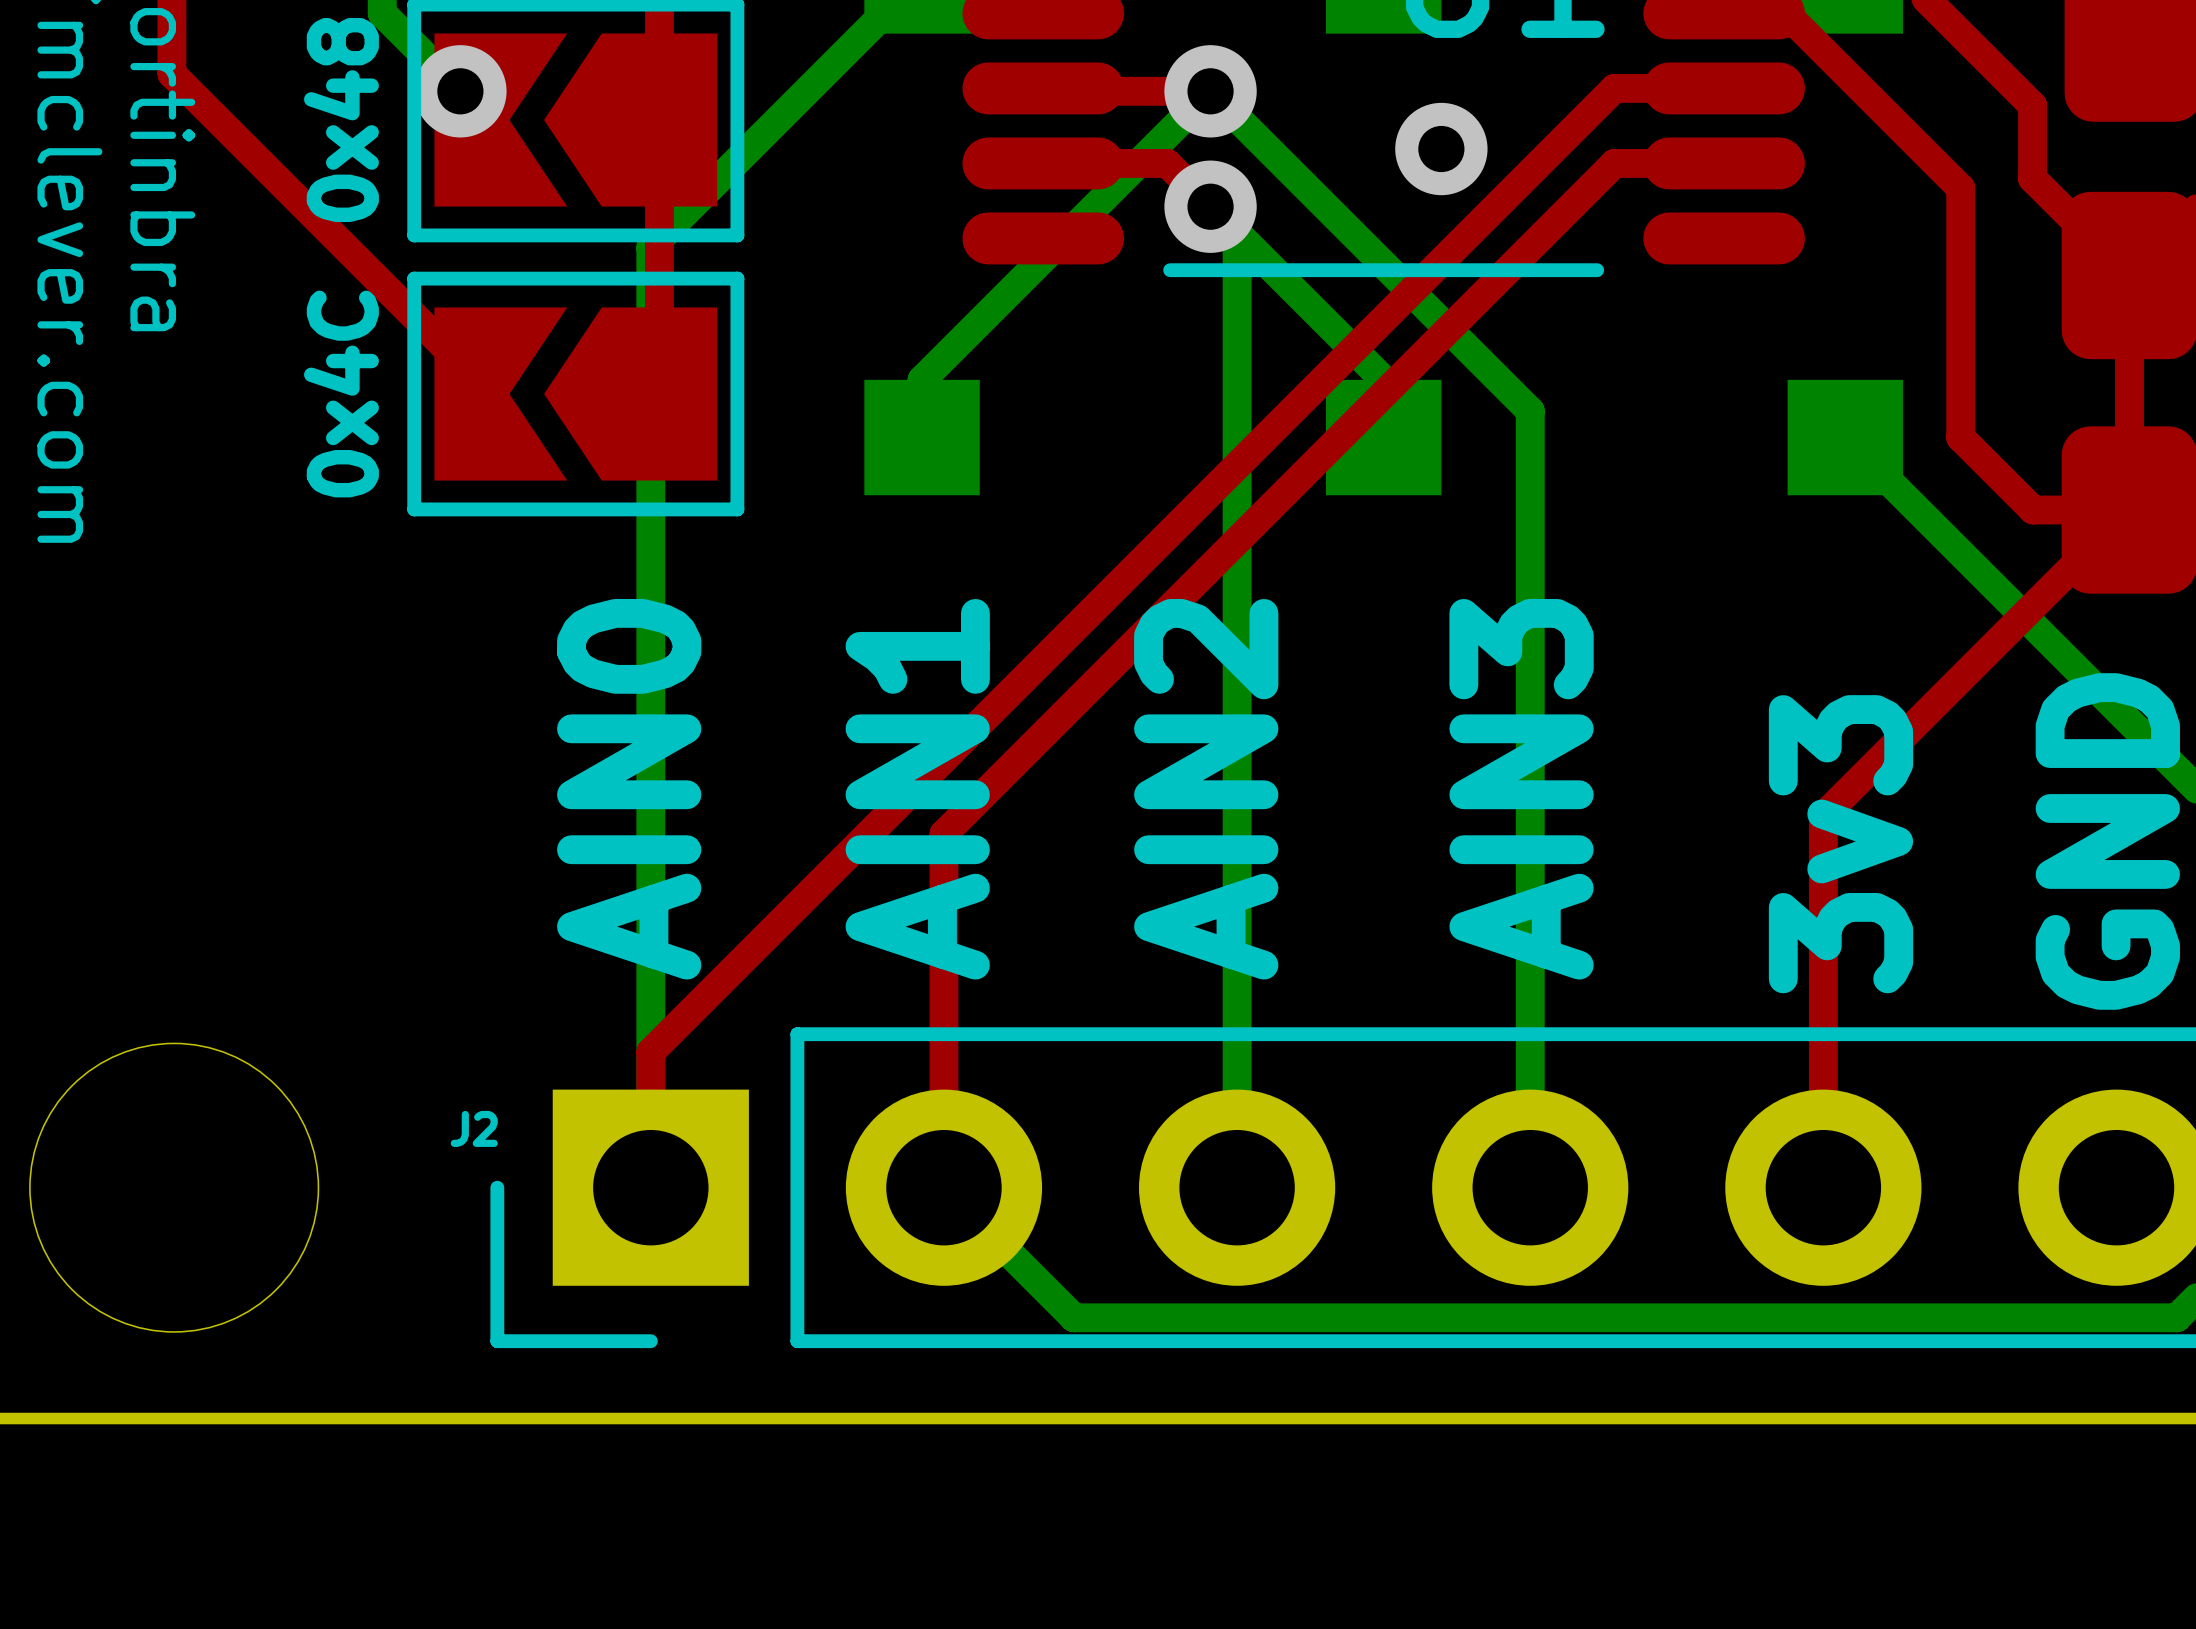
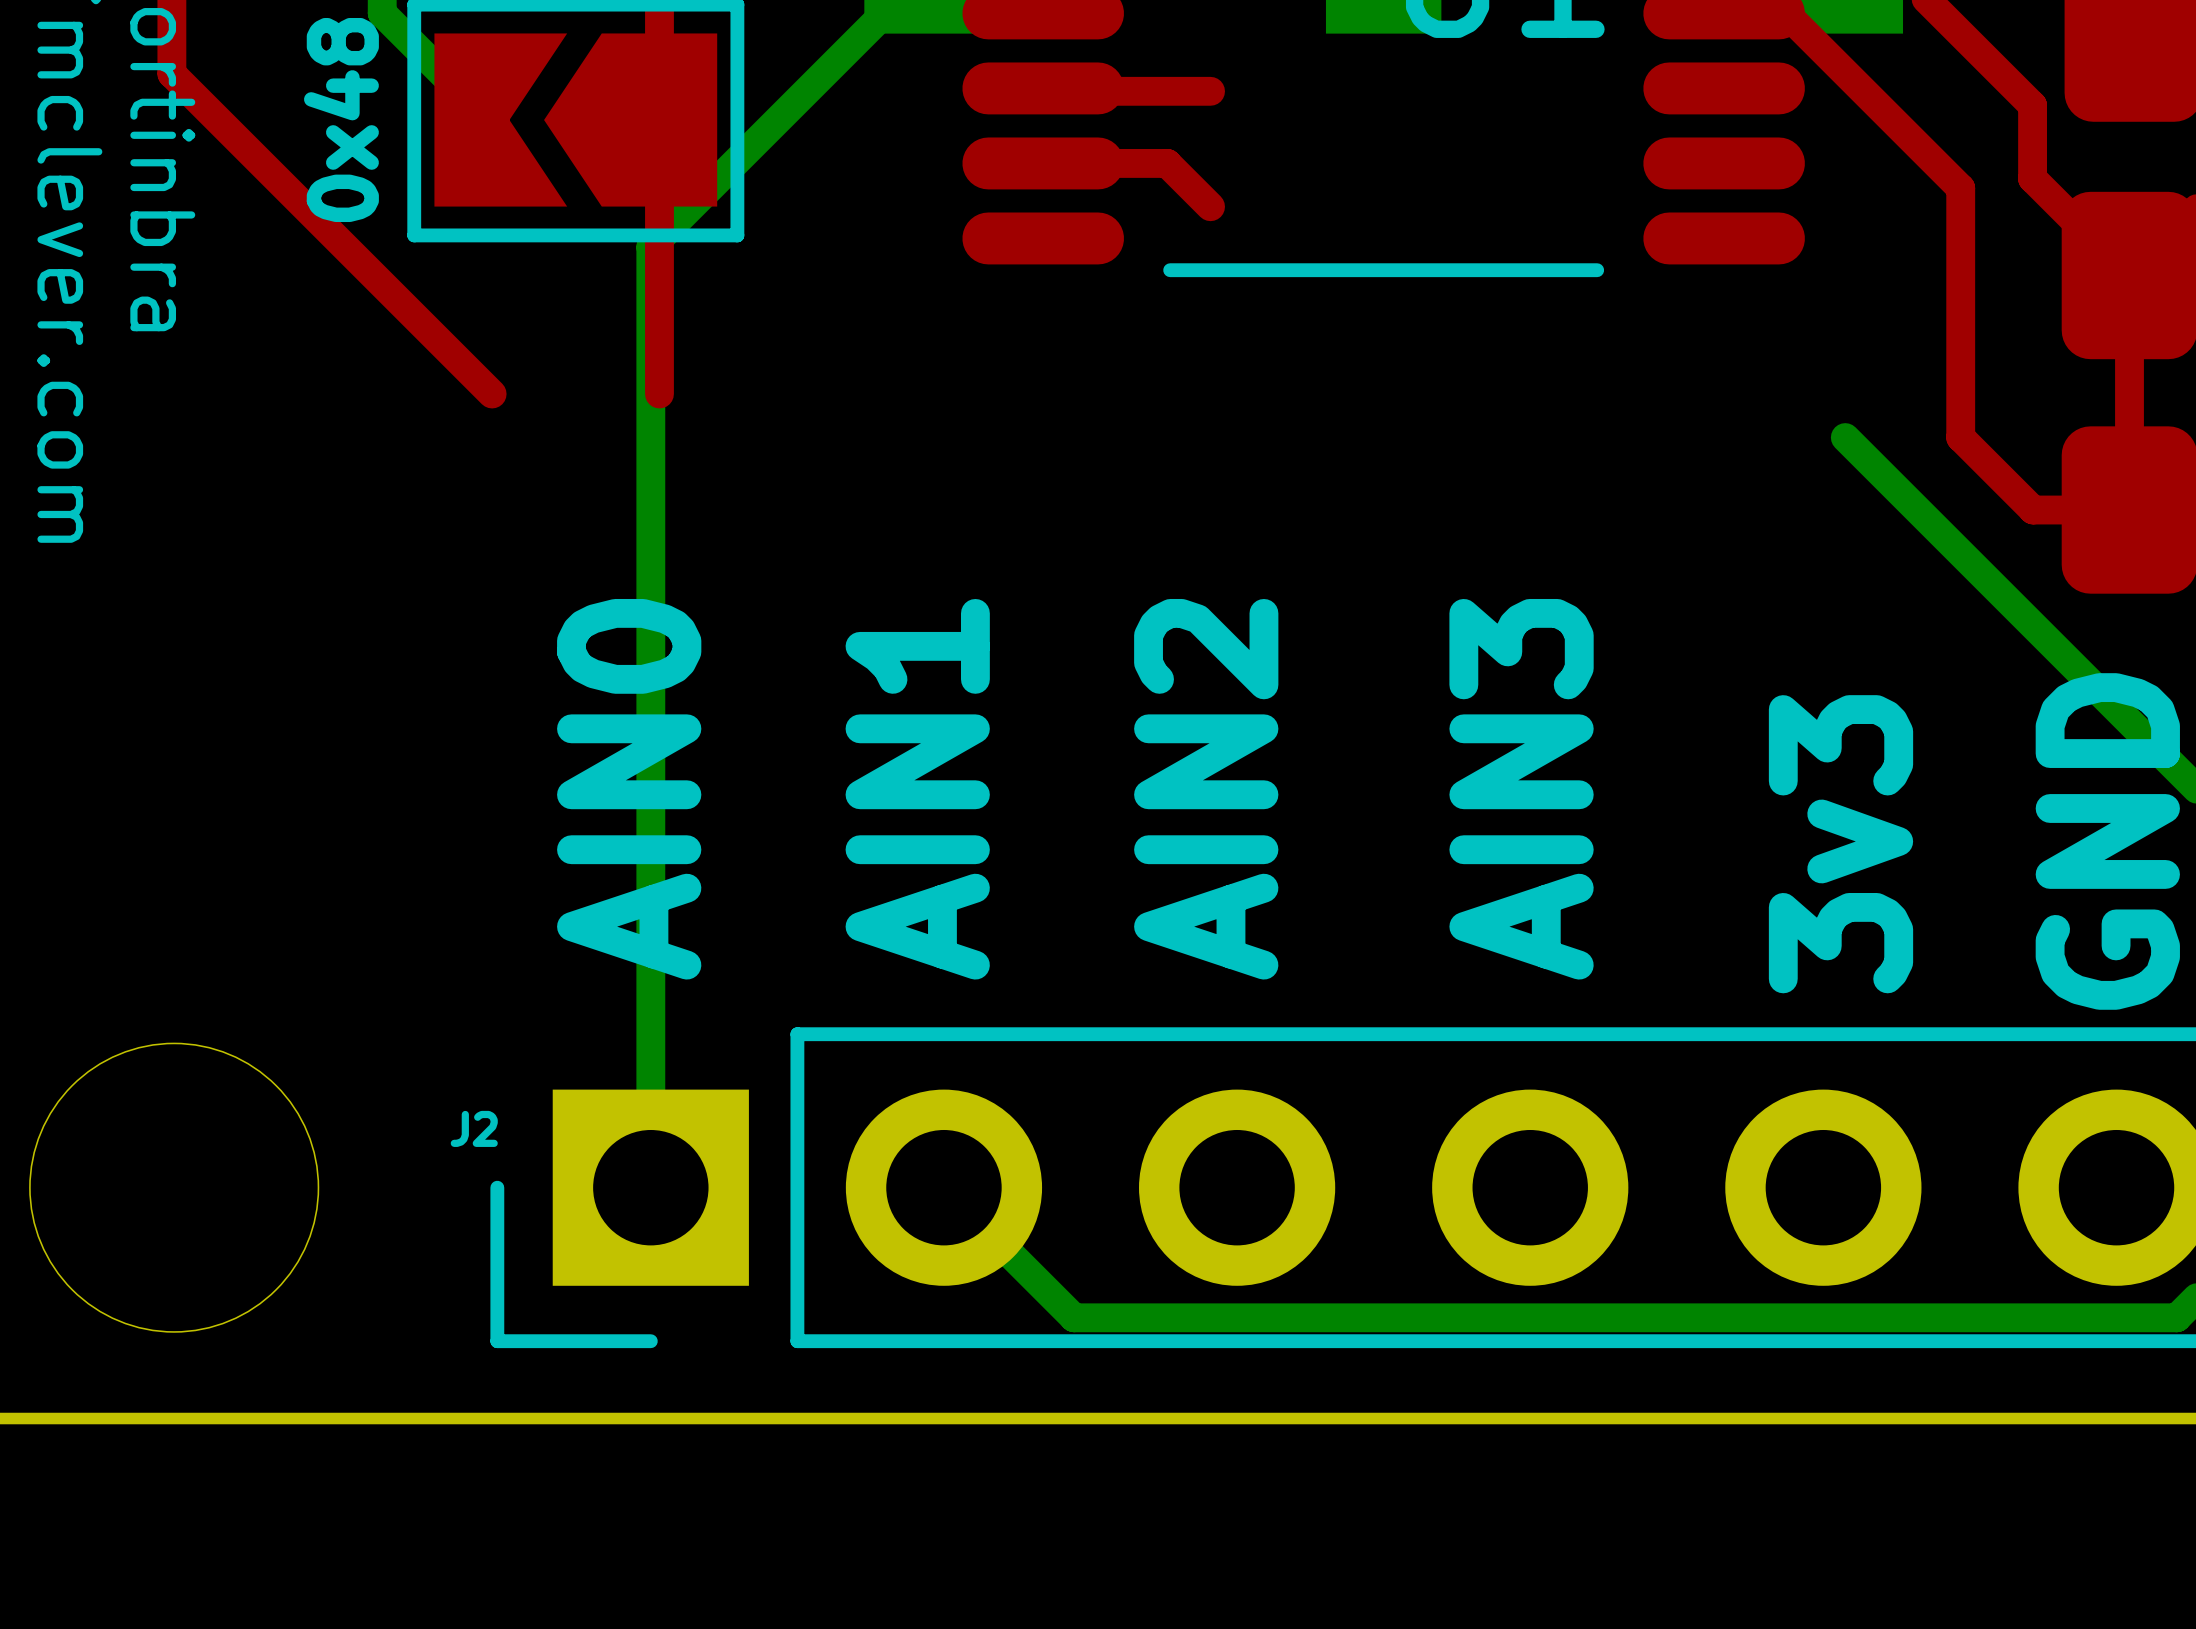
top track: (1724, 88) (1614, 88) (650, 1052) (650, 1187) -> none
via: (460, 91) -> none
via: (1210, 91) -> none
via: (1441, 149) -> none
top track: (1724, 163) (1614, 163) (943, 833) (943, 1187) -> none
bottom track: (1210, 206) (1383, 379) (1383, 437) -> none
via: (1210, 206) -> none
bottom track: (1237, 233) (1237, 1187) -> none
part: (575, 394) -> none
bottom track: (922, 437) (922, 379) (1210, 91) (1530, 411) (1530, 1187) -> none
part: (922, 437) -> none
part: (1383, 437) -> none
part: (1845, 437) -> none
top track: (2129, 510) (1823, 816) (1823, 1187) -> none

